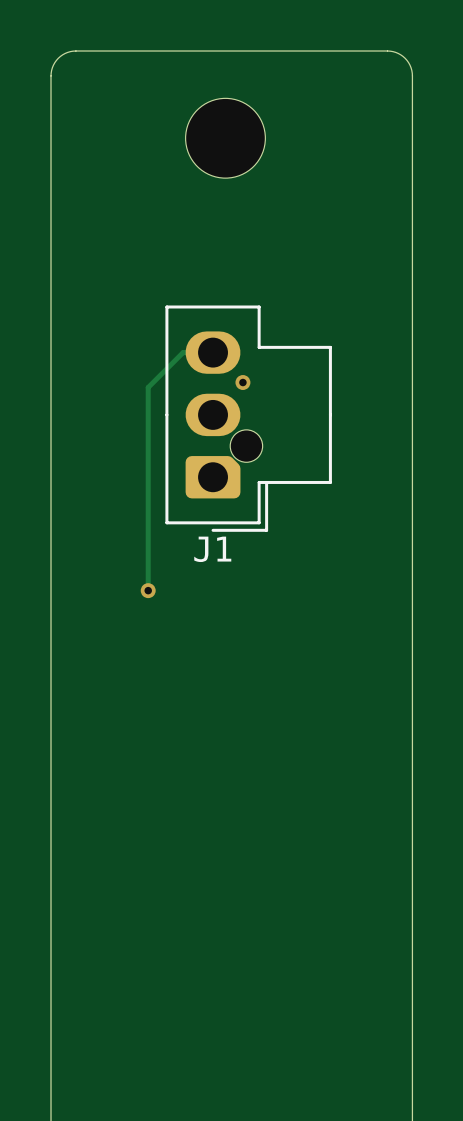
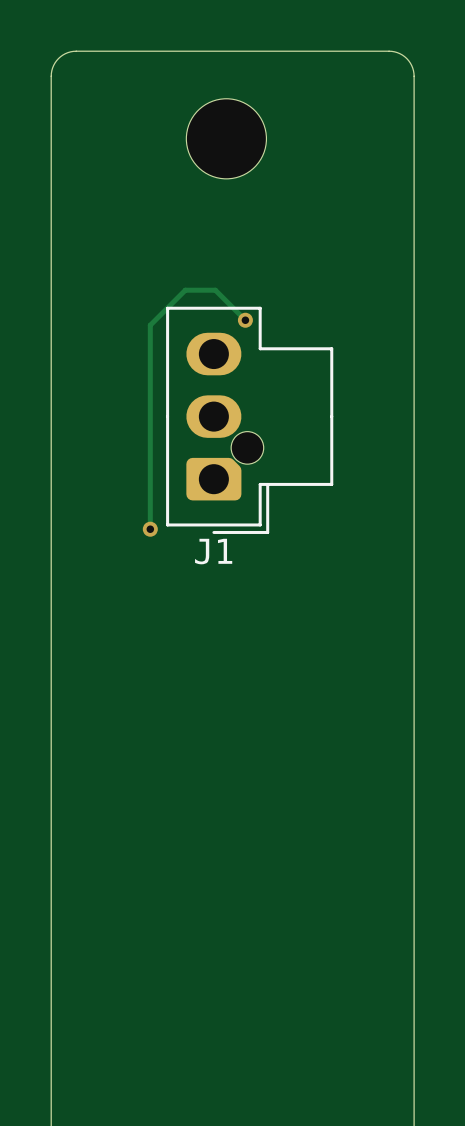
track: none -> (245, 320) (215, 290) (185, 290) (150, 325) (150, 529)
track: (213, 352) (183, 352) (148, 387) (148, 590) -> none
via position: (242, 382) -> (245, 320)
via position: (148, 590) -> (150, 529)

